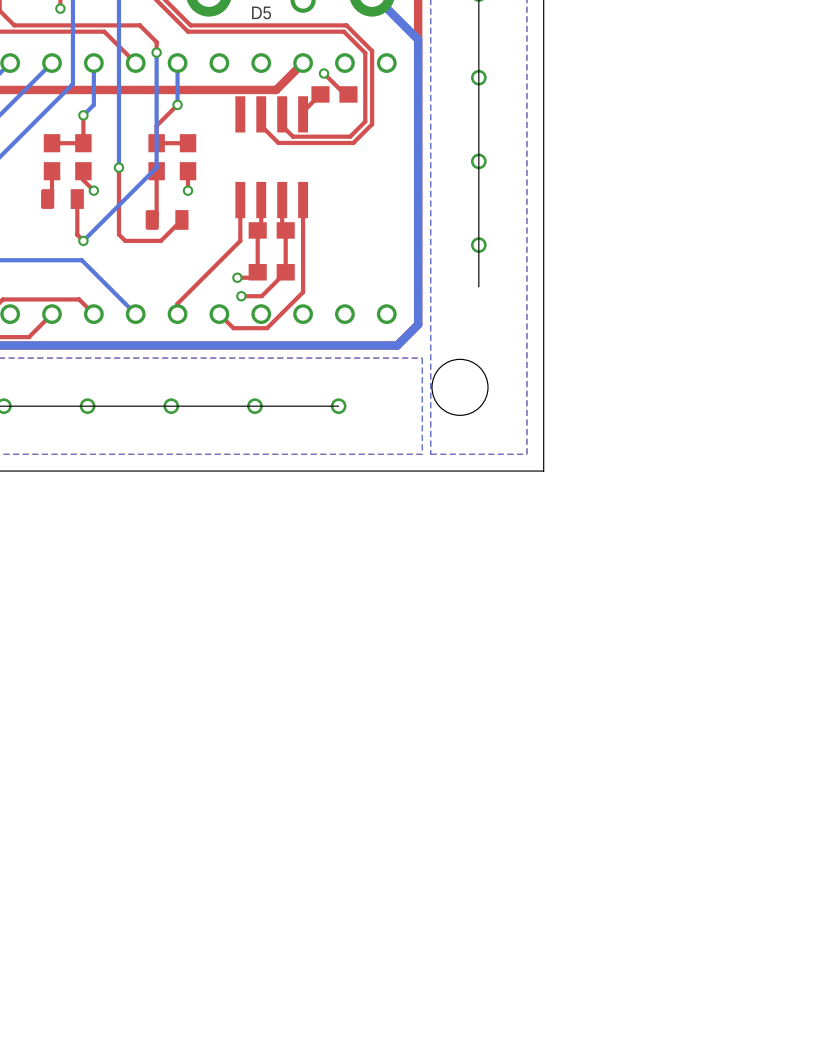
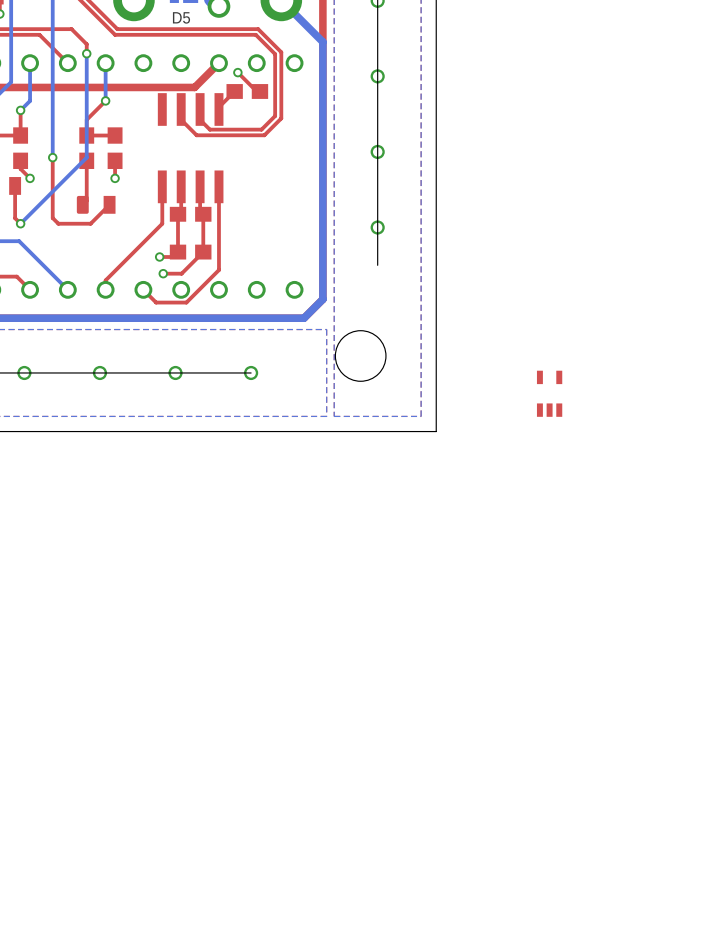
part: none -> (549, 393)

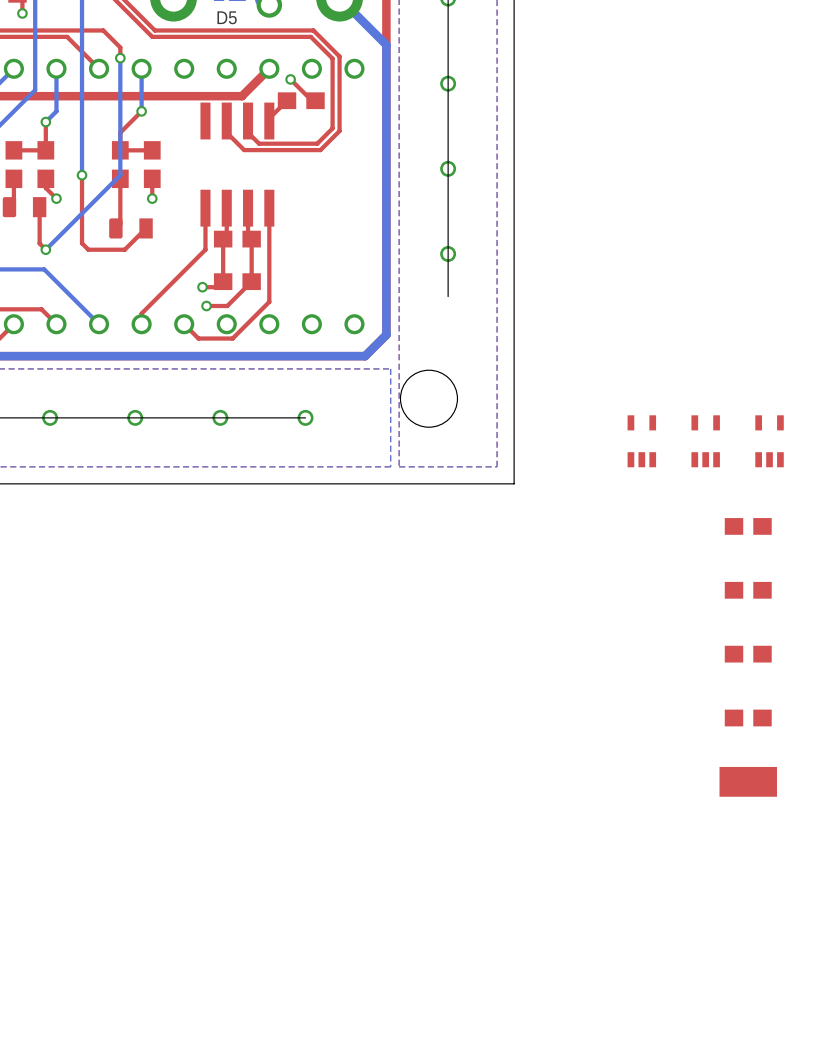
part: none -> (705, 441)
part: none -> (769, 441)
part: none -> (748, 526)
part: none -> (748, 590)
part: none -> (748, 654)
part: none -> (748, 718)
part: none -> (748, 781)

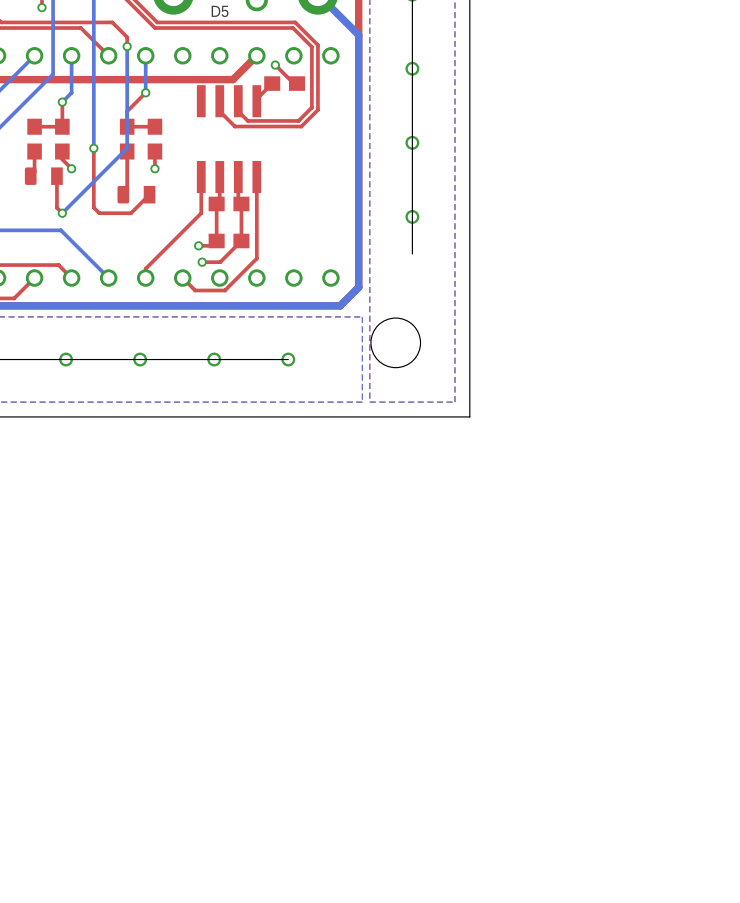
part: (641, 441) -> none
part: (705, 441) -> none
part: (769, 441) -> none
part: (748, 526) -> none
part: (748, 590) -> none
part: (748, 654) -> none
part: (748, 718) -> none
part: (748, 781) -> none

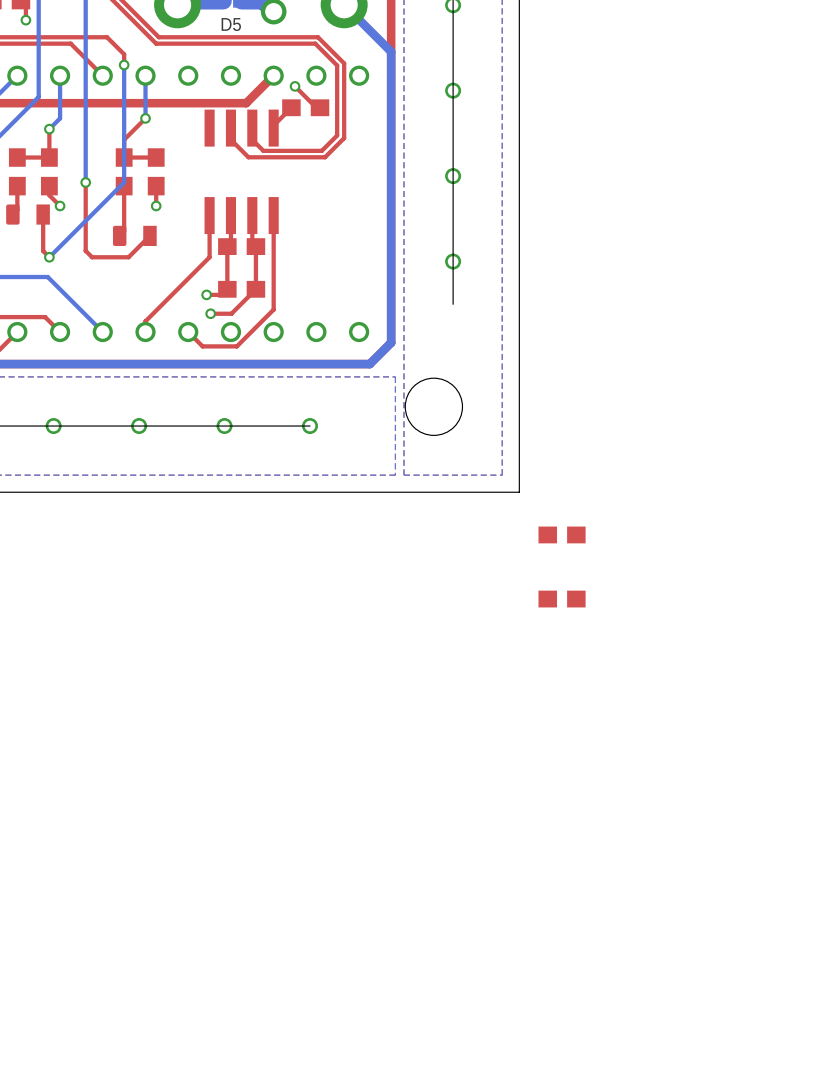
part: none -> (562, 534)
part: none -> (562, 599)

